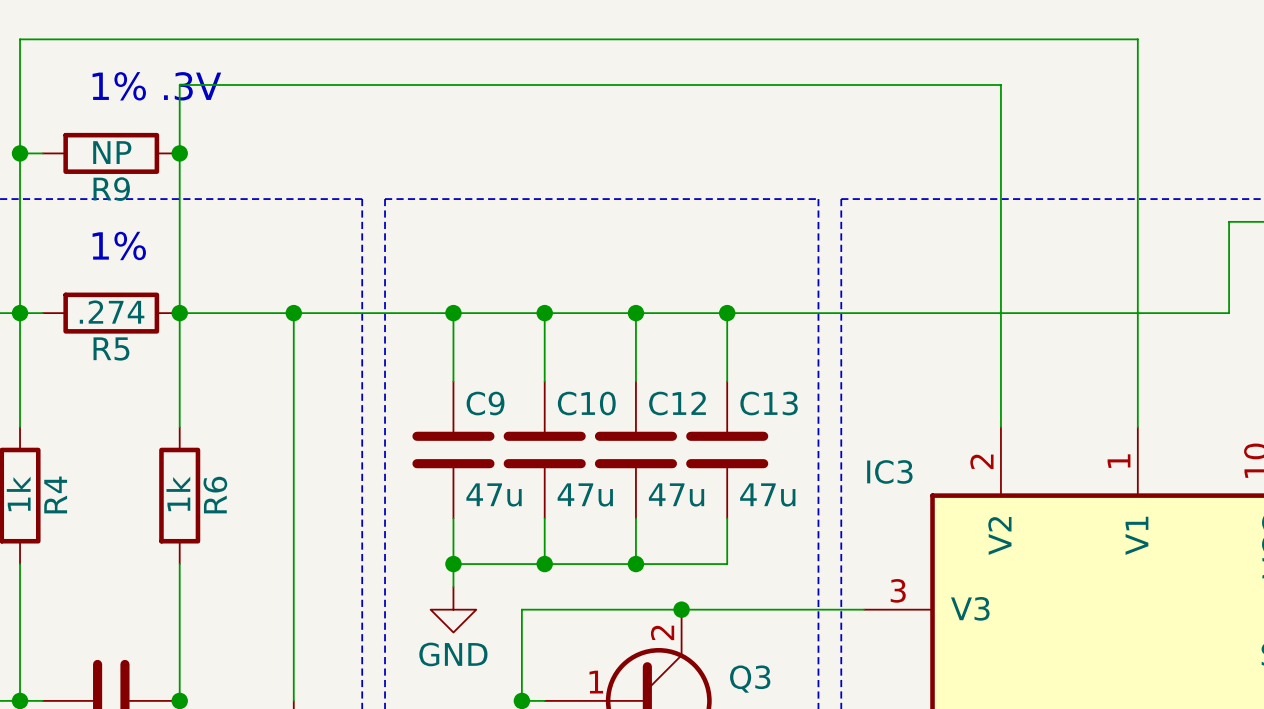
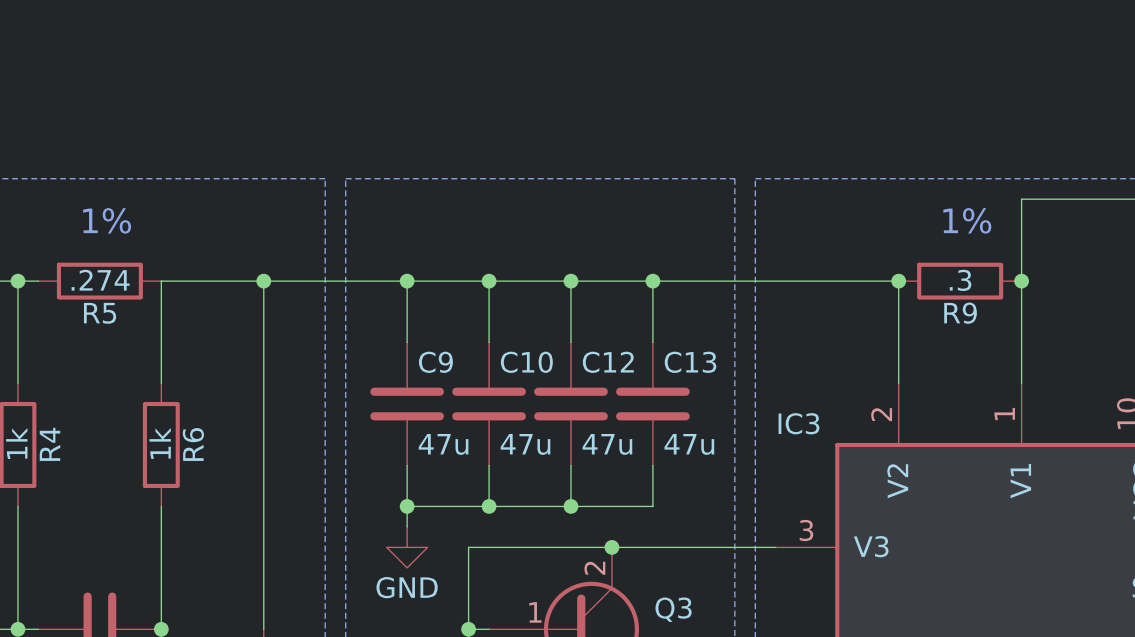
text: 1% .3V (156, 86) -> none
R9 value: NP (112, 152) -> .3 (960, 280)
wire: (20, 153) (42, 153) -> none
junction: (20, 153) -> none
R9 position: (111, 153) -> (960, 281)
junction: (179, 153) -> none
wire: (1137, 221) (1137, 39) (20, 39) (20, 313) -> none
wire: (1229, 221) (1229, 313) (1000, 313) (1000, 84) (179, 84) (179, 313) -> (1103, 199) (1021, 199)
text: none -> 1% (967, 220)
junction: (179, 313) -> none
junction: none -> (898, 281)
junction: none -> (1021, 281)

